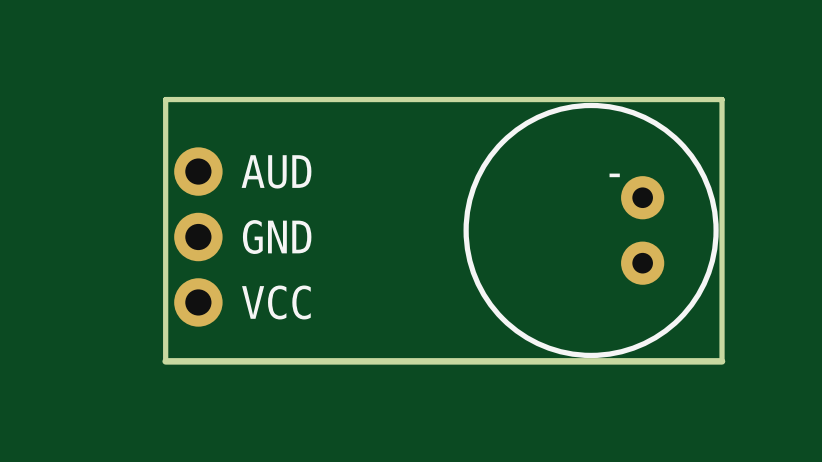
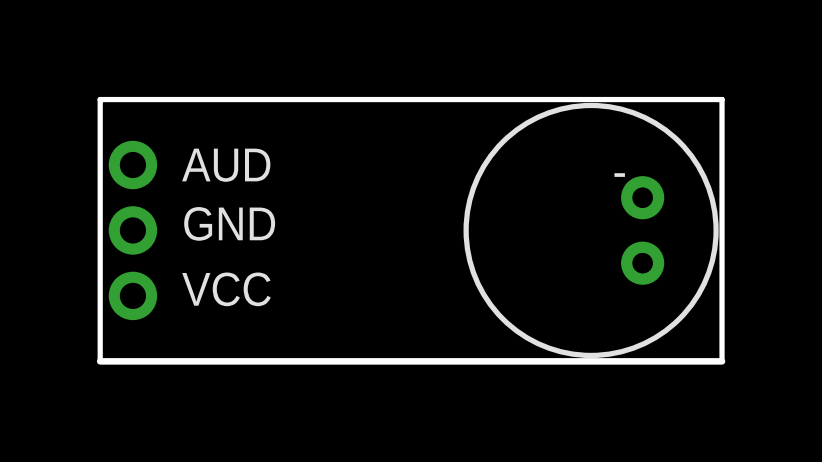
board edge: (165, 99) (165, 361) -> (165, 99) (100, 99) (100, 361) (165, 361)
text position: AUD (276, 171) -> AUD (226, 165)
part position: (198, 237) -> (132, 230)
text position: GND (277, 237) -> GND (229, 223)
text position: VCC (276, 302) -> VCC (226, 289)

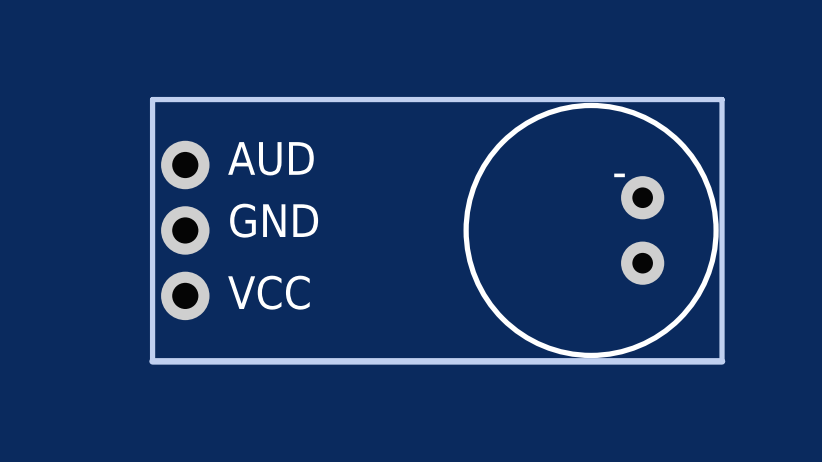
board edge: (152, 99) (100, 99) (100, 361) (152, 361) -> (152, 99) (152, 361)
text position: AUD (226, 165) -> AUD (270, 158)
text position: GND (229, 223) -> GND (274, 220)
part position: (132, 230) -> (185, 230)
text position: VCC (226, 289) -> VCC (268, 292)

